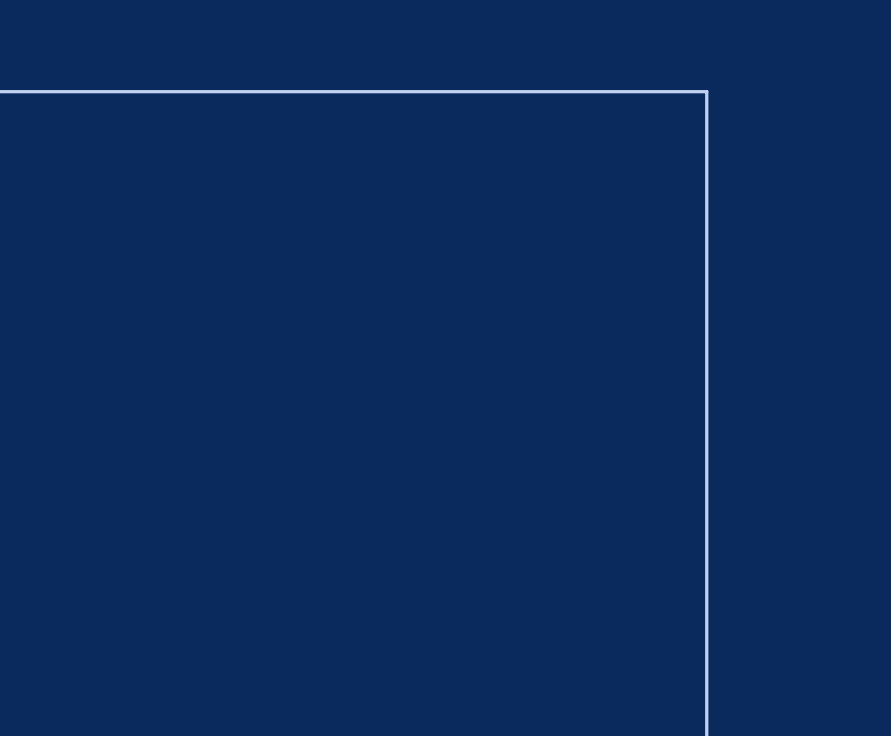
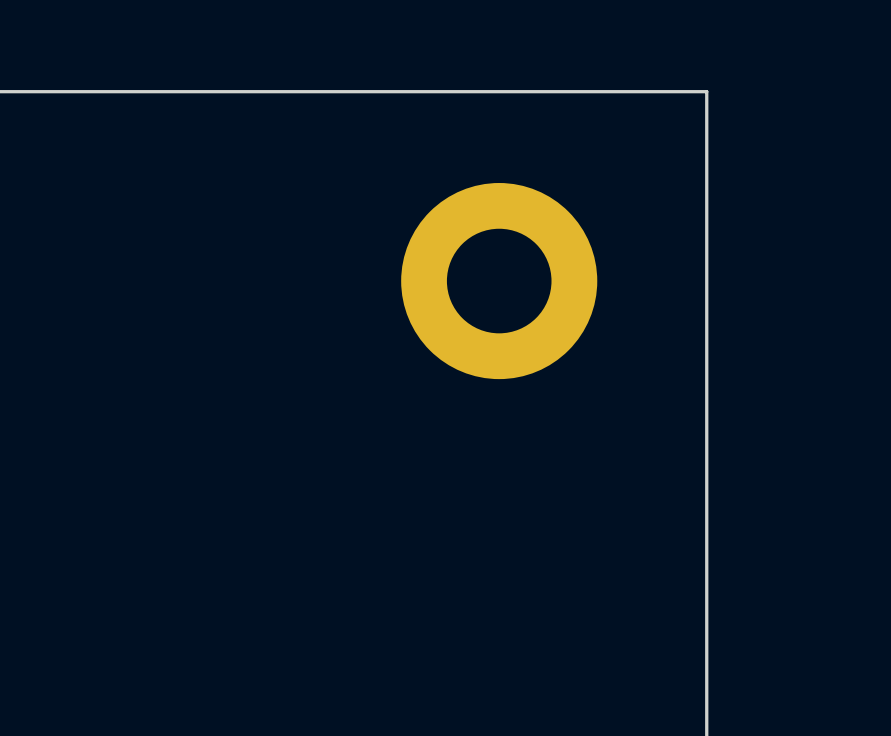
part: none -> (499, 281)

